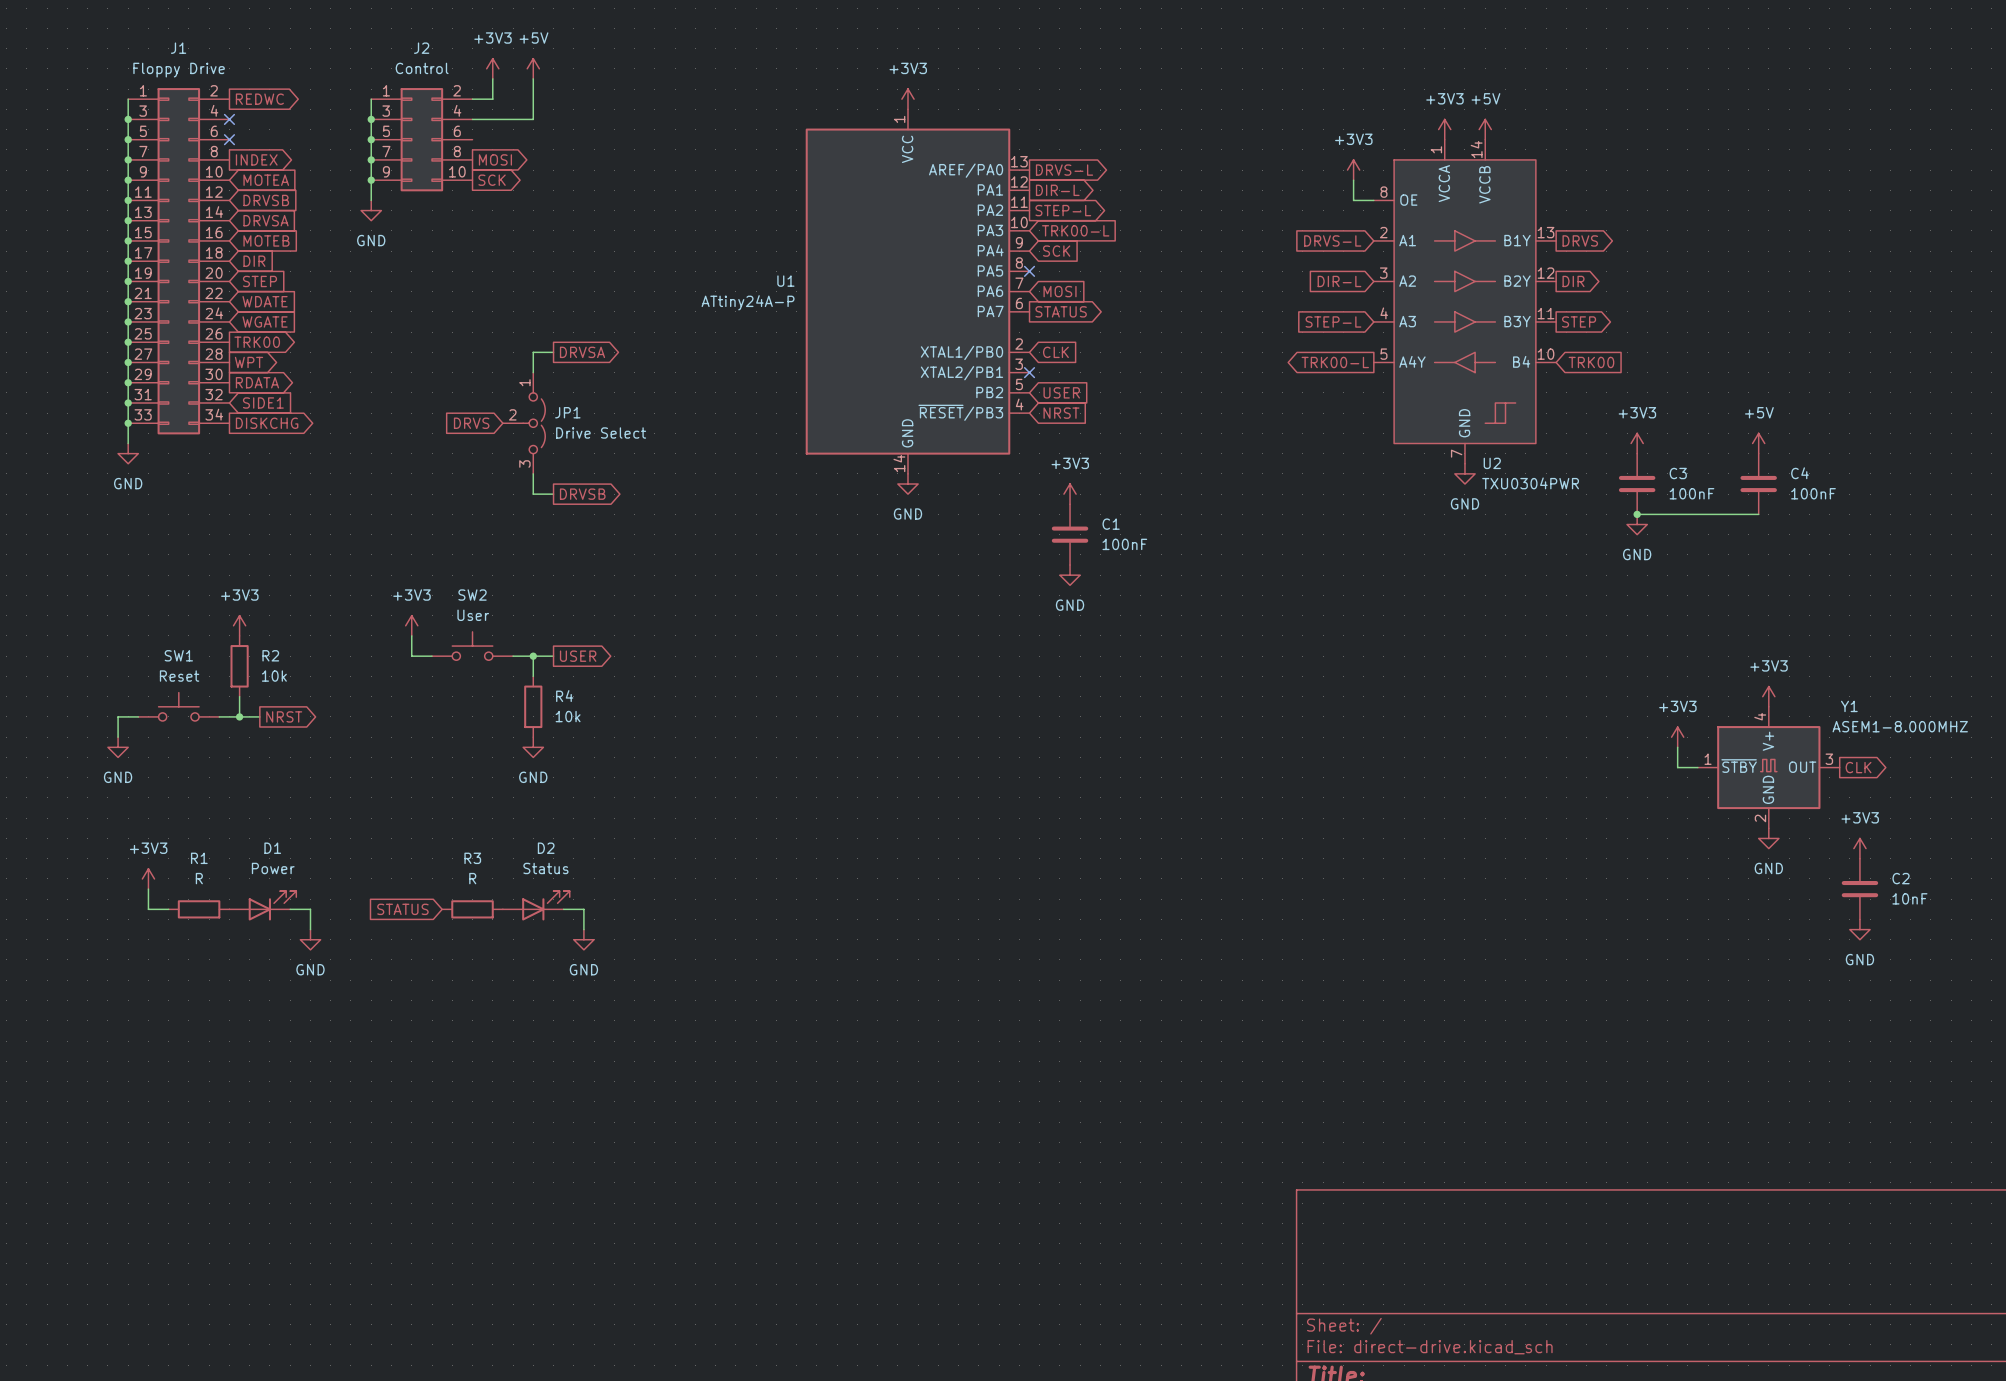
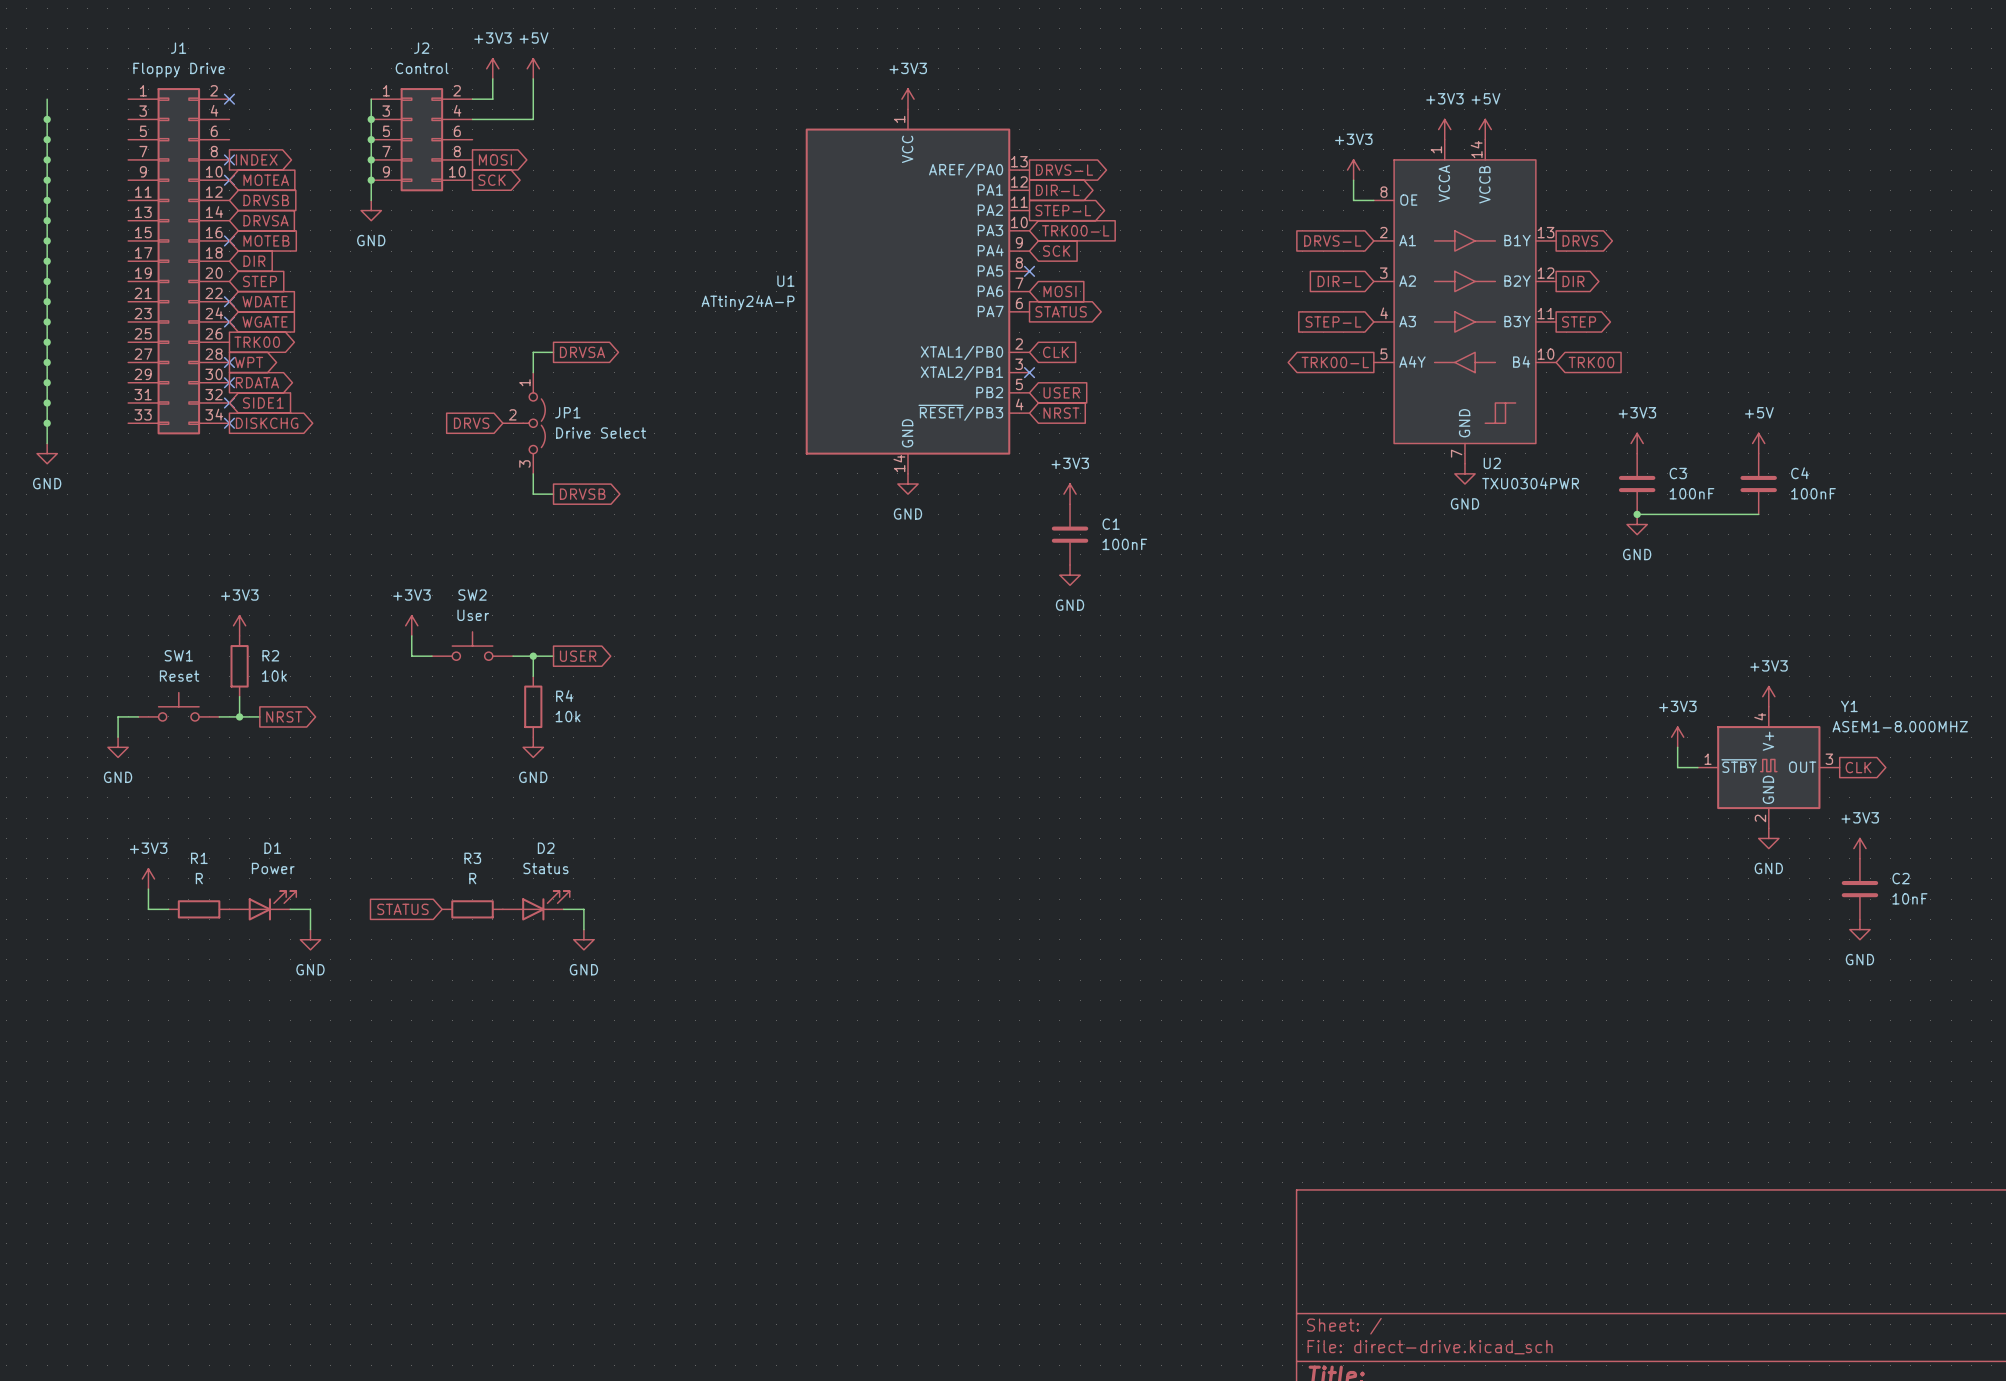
wire: (128, 99) (128, 443) -> (47, 99) (47, 443)
no-connect mark: none -> (229, 99)
global label: REDWC (259, 99) -> none
junction: none -> (47, 119)
junction: (128, 119) -> none
no-connect mark: (229, 119) -> none
junction: none -> (47, 139)
junction: (128, 139) -> none
no-connect mark: (229, 139) -> none
junction: none -> (47, 159)
junction: (128, 159) -> none
no-connect mark: none -> (229, 159)
junction: none -> (47, 180)
junction: (128, 180) -> none
no-connect mark: none -> (229, 180)
junction: none -> (47, 200)
junction: (128, 200) -> none
junction: none -> (47, 220)
junction: (128, 220) -> none
junction: none -> (47, 240)
junction: (128, 240) -> none
no-connect mark: none -> (229, 240)
junction: none -> (47, 261)
junction: (128, 261) -> none
junction: none -> (47, 281)
junction: (128, 281) -> none
junction: none -> (47, 301)
junction: (128, 301) -> none
no-connect mark: none -> (229, 301)
junction: none -> (47, 321)
junction: (128, 321) -> none
no-connect mark: none -> (229, 321)
junction: none -> (47, 342)
junction: (128, 342) -> none
junction: none -> (47, 362)
junction: (128, 362) -> none
no-connect mark: none -> (229, 362)
junction: none -> (47, 382)
junction: (128, 382) -> none
no-connect mark: none -> (229, 382)
junction: none -> (47, 402)
junction: (128, 402) -> none
no-connect mark: none -> (229, 402)
junction: none -> (47, 423)
junction: (128, 423) -> none
no-connect mark: none -> (229, 423)
power symbol position: GND (128, 453) -> GND (47, 453)

